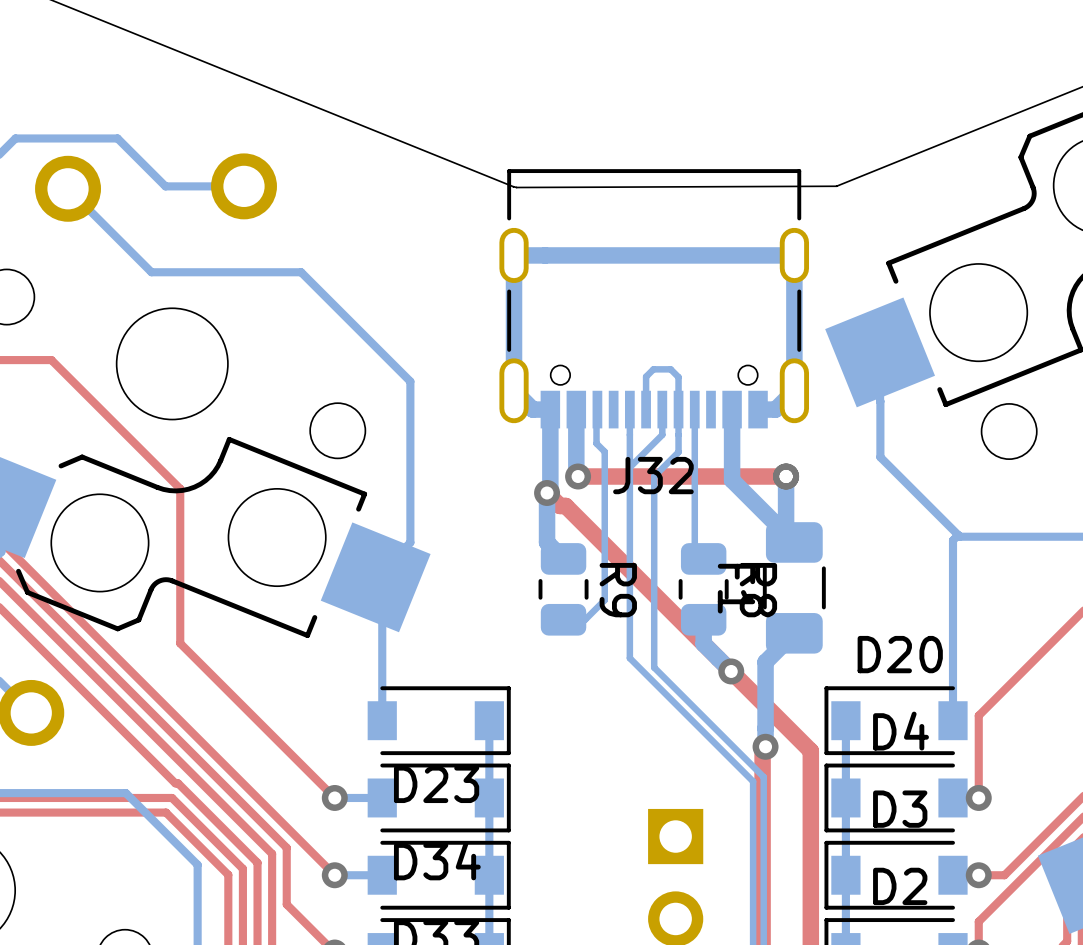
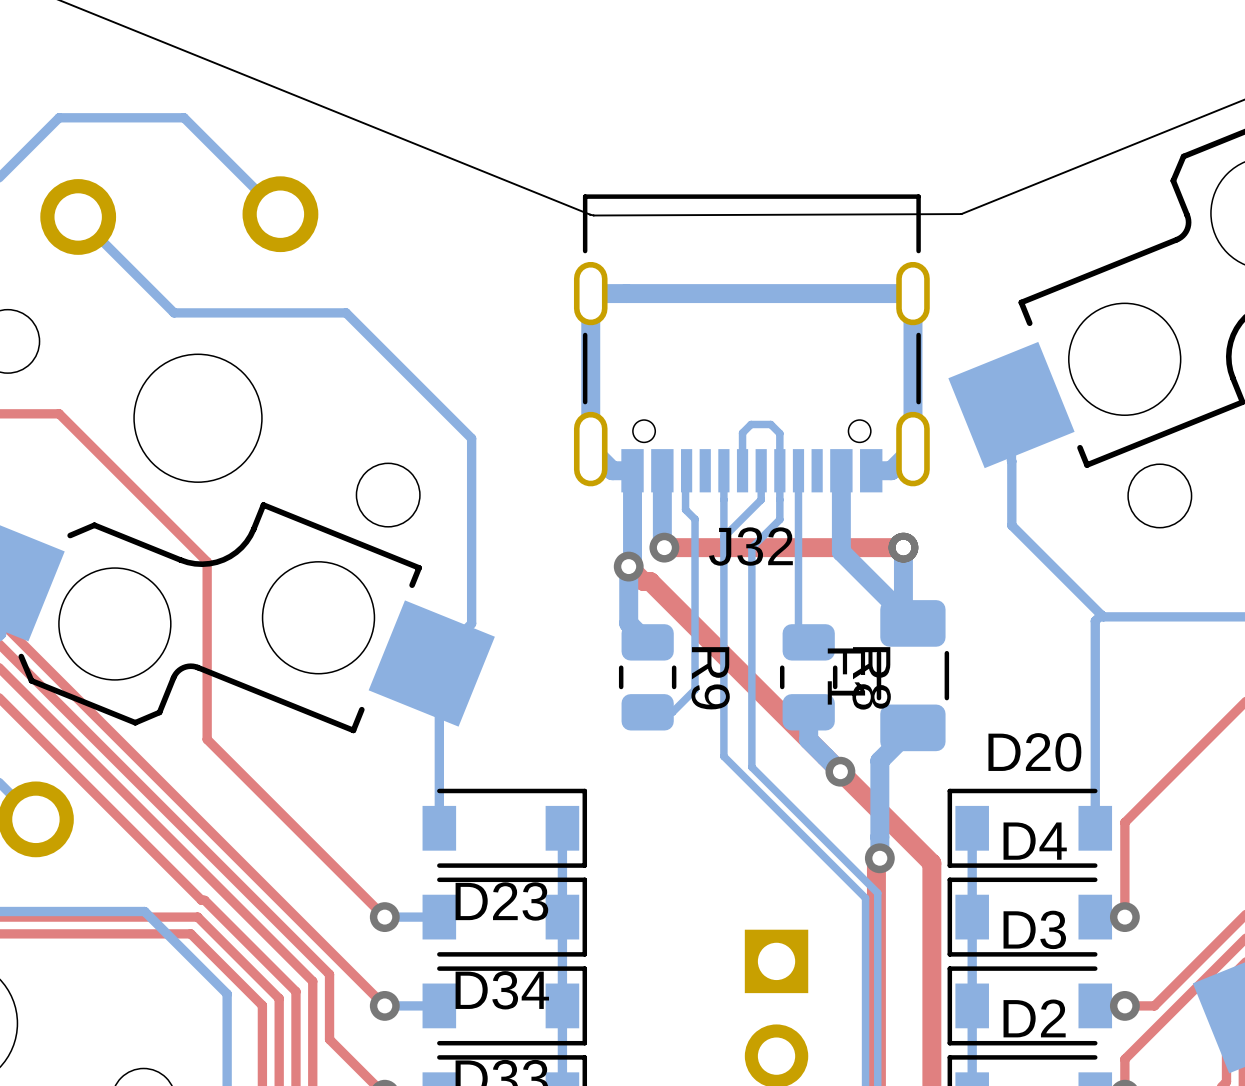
bottom track: (15, 138) (117, 138) (165, 186) (244, 186) -> (17, 159) (59, 117) (184, 117) (280, 214)

